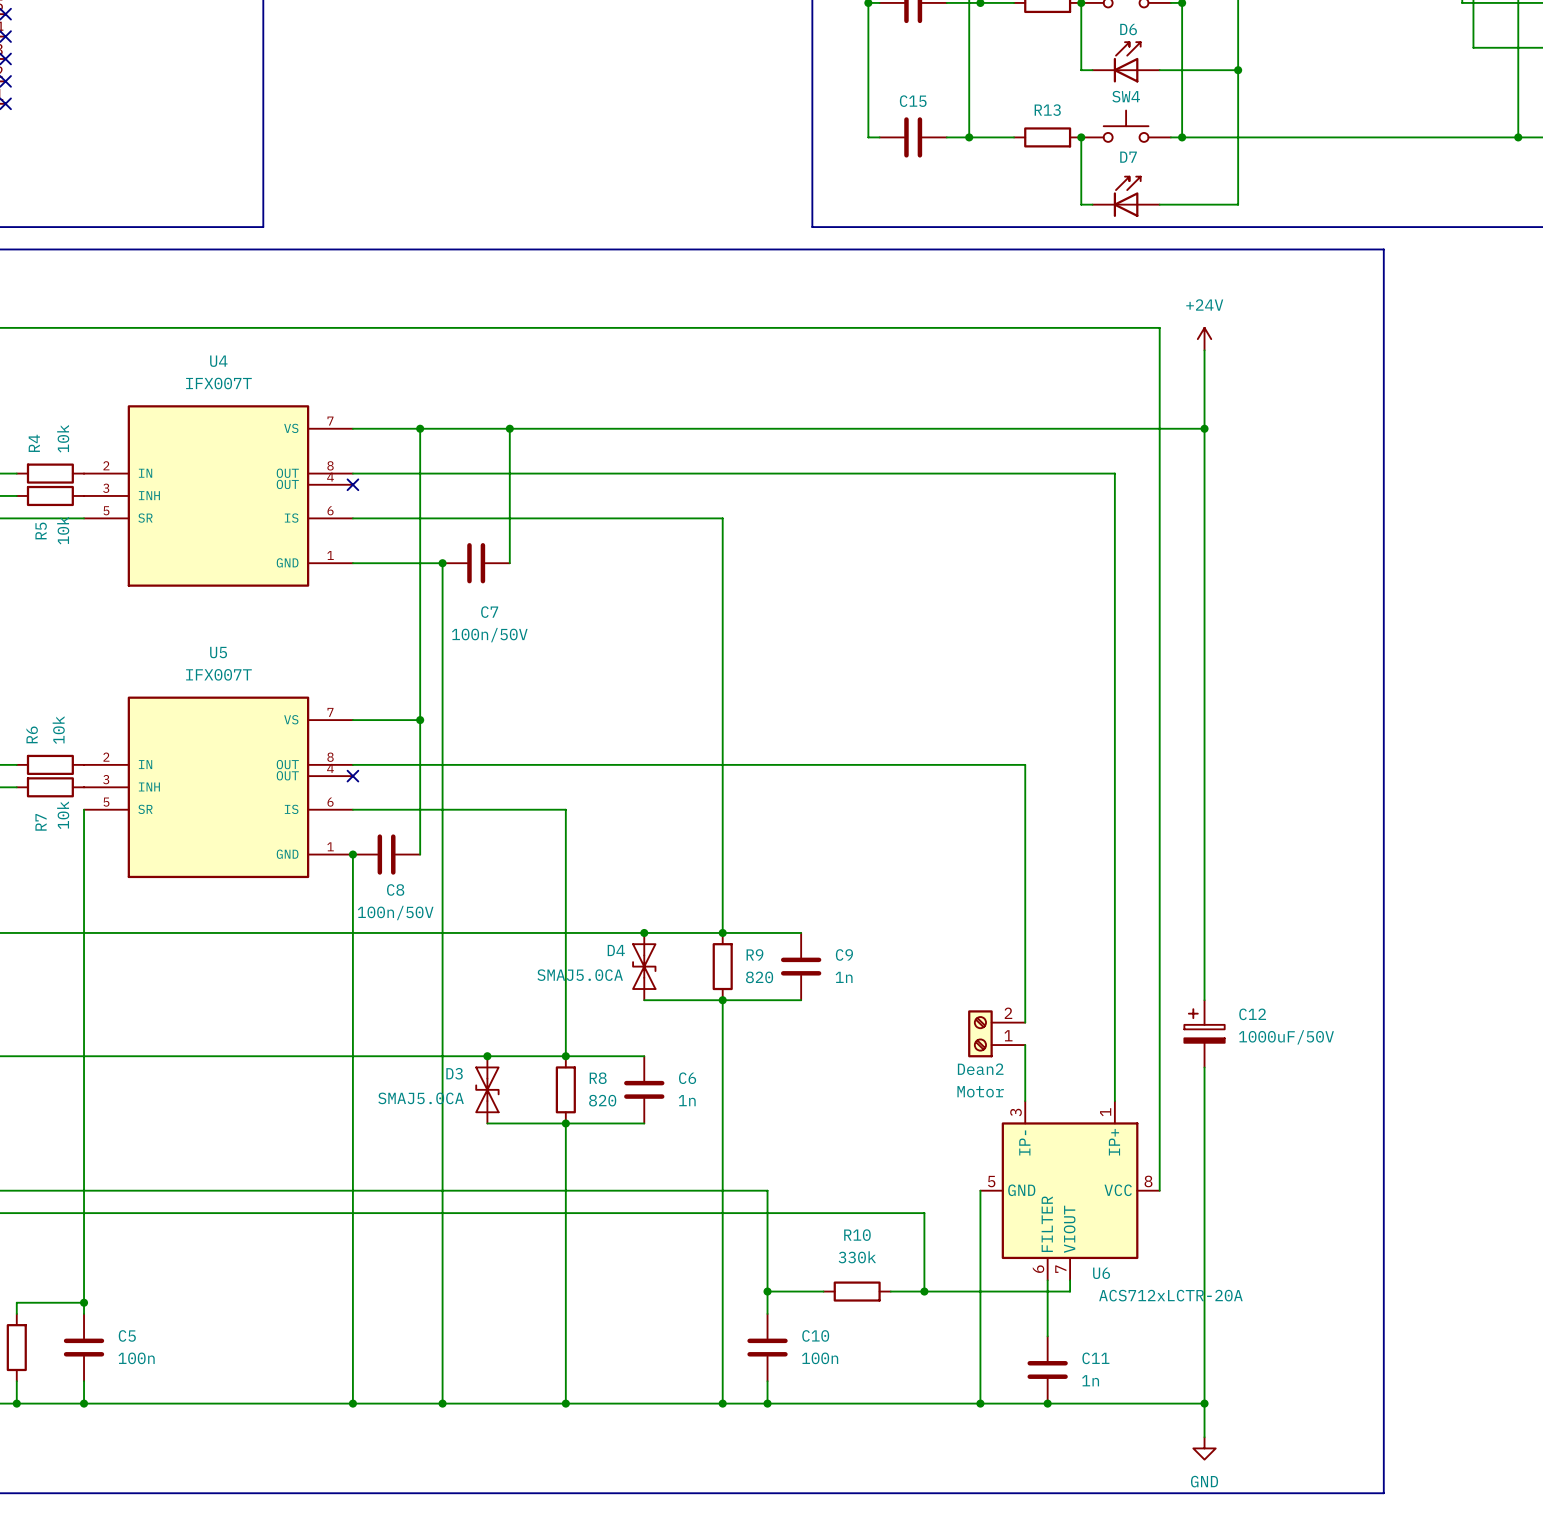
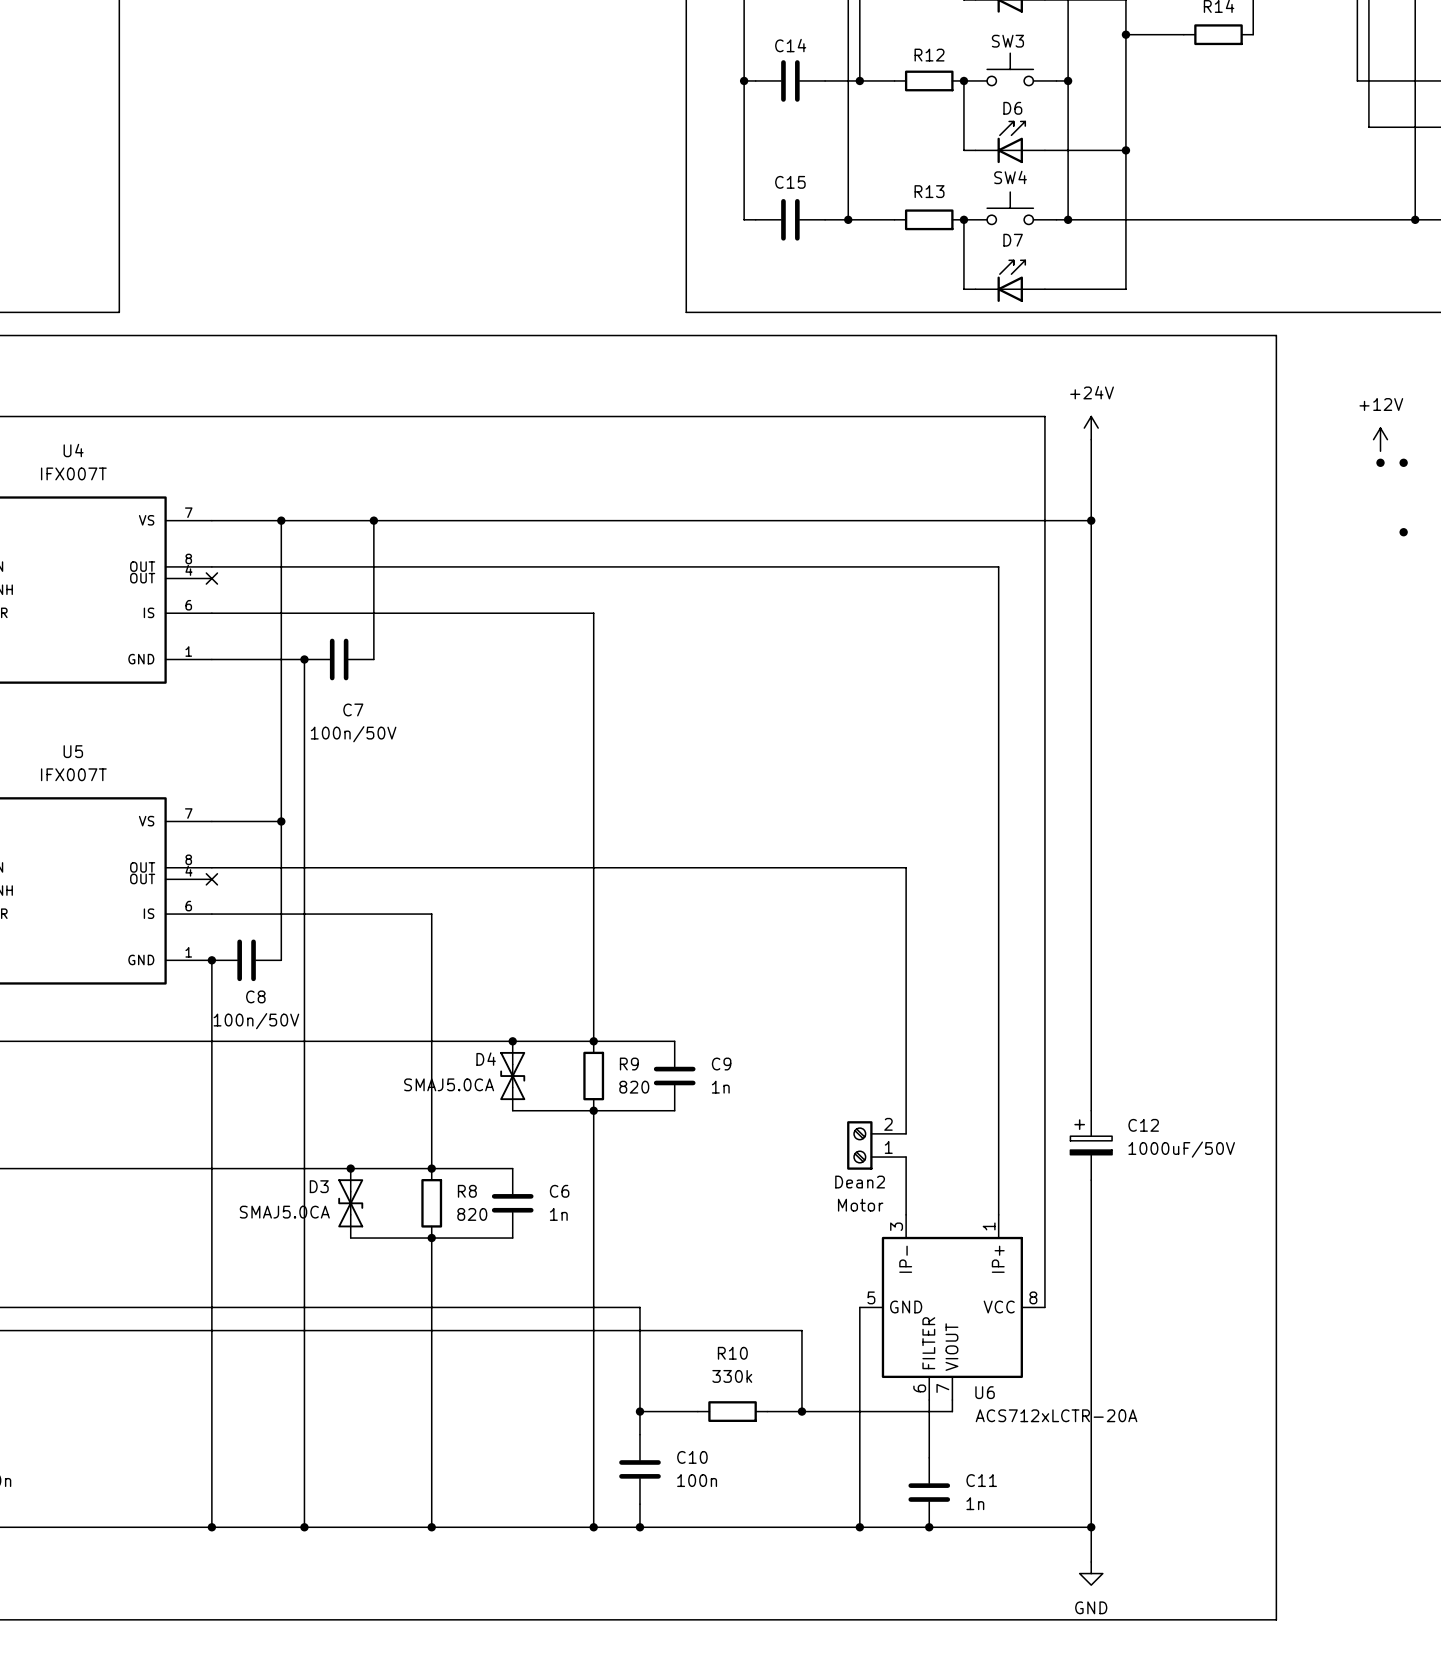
power symbol: none -> +12V (1380, 439)
junction: none -> (1380, 462)
junction: none -> (1403, 462)
junction: none -> (1403, 532)

